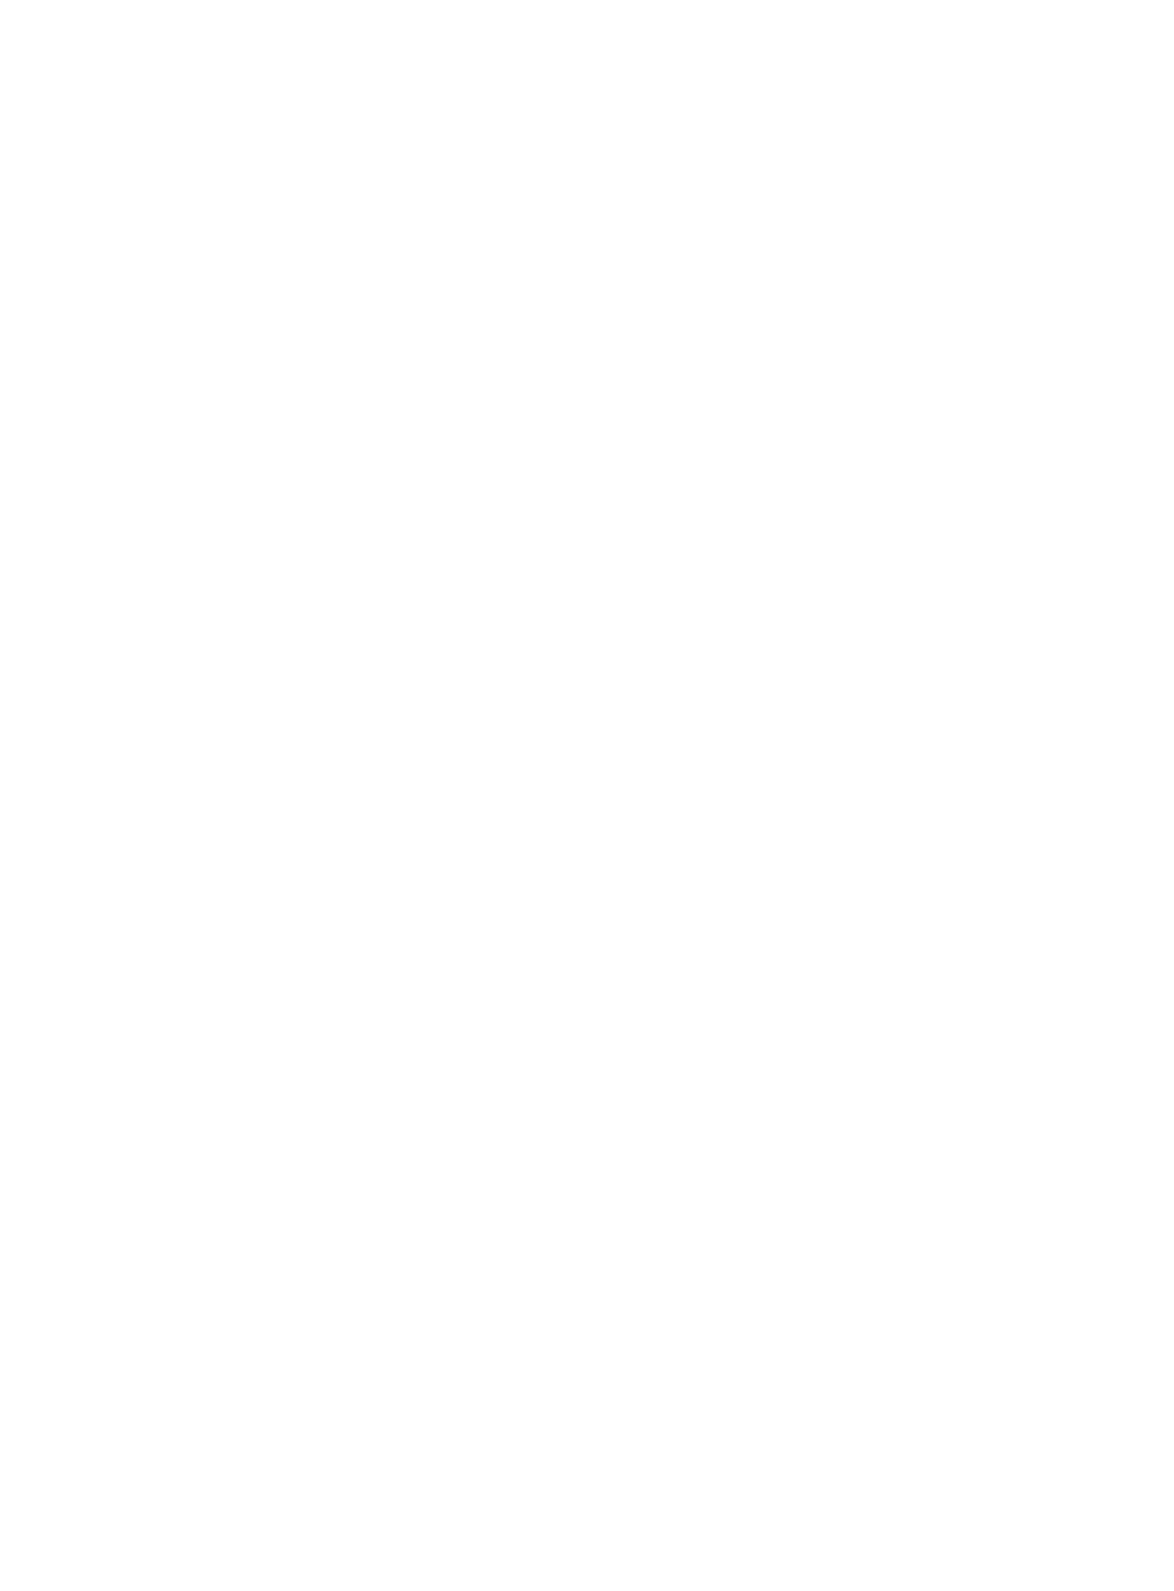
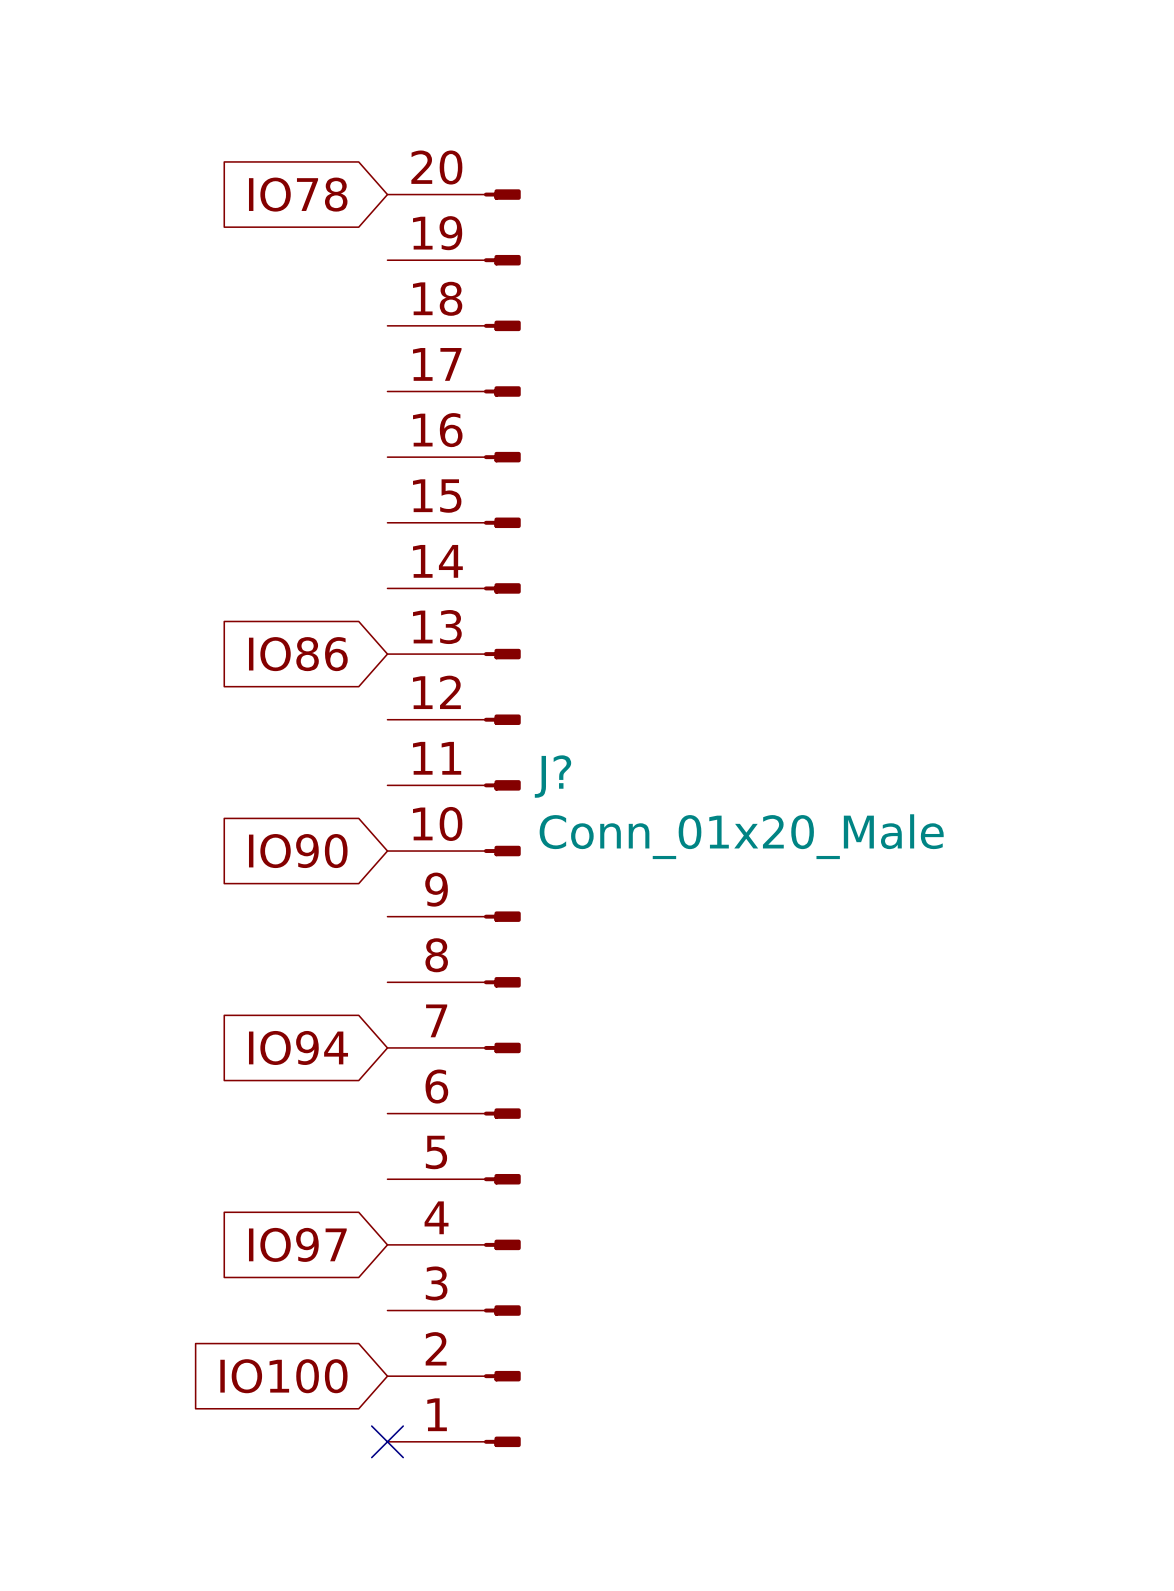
global label: none -> IO78 (298, 194)
global label: none -> IO86 (298, 654)
J?: none -> Conn_01x20_Male (454, 818)
global label: none -> IO90 (298, 851)
global label: none -> IO94 (298, 1047)
global label: none -> IO97 (297, 1244)
global label: none -> IO100 (283, 1376)
no-connect mark: none -> (387, 1441)

